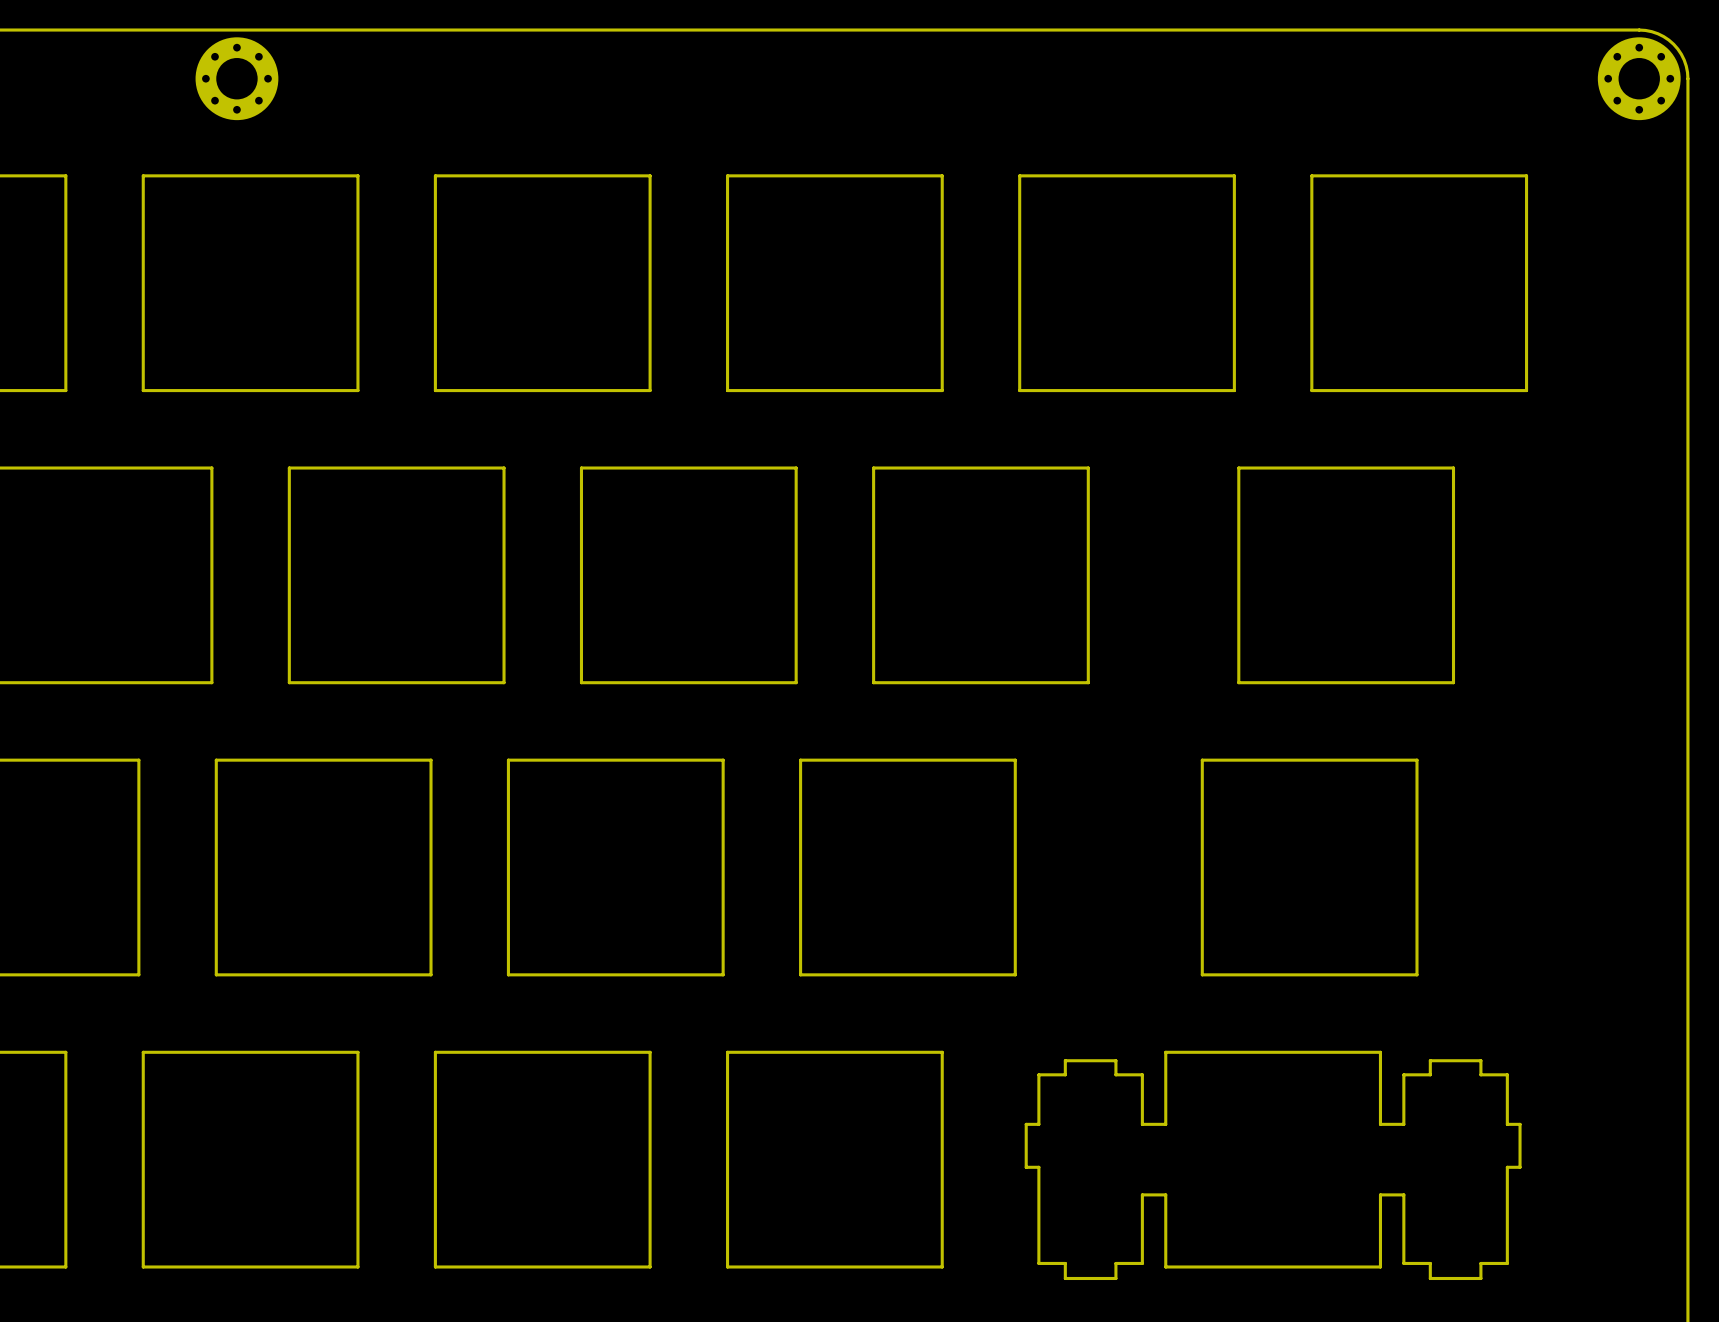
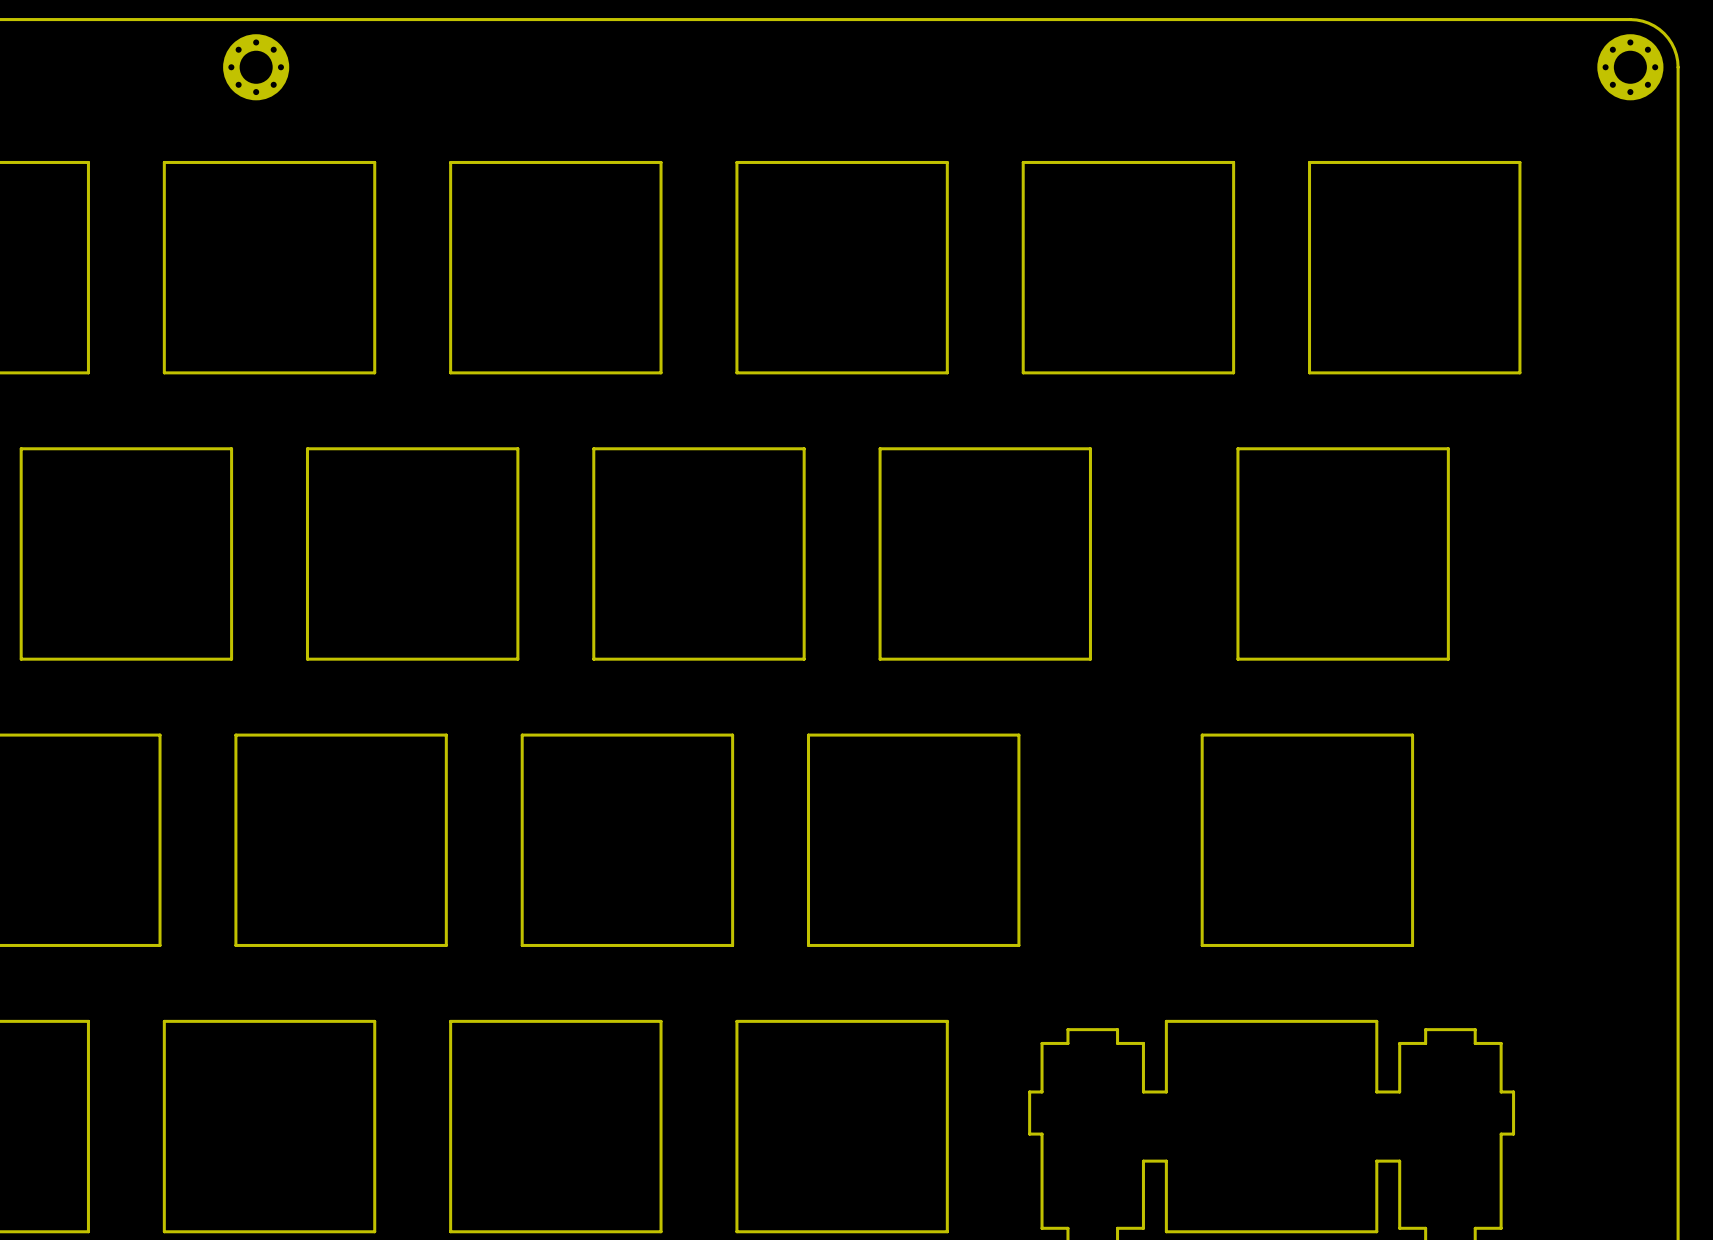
part footprint: [195, 37, 279, 121] -> [223, 34, 290, 101]
part footprint: [1597, 37, 1681, 121] -> [1597, 34, 1664, 101]

